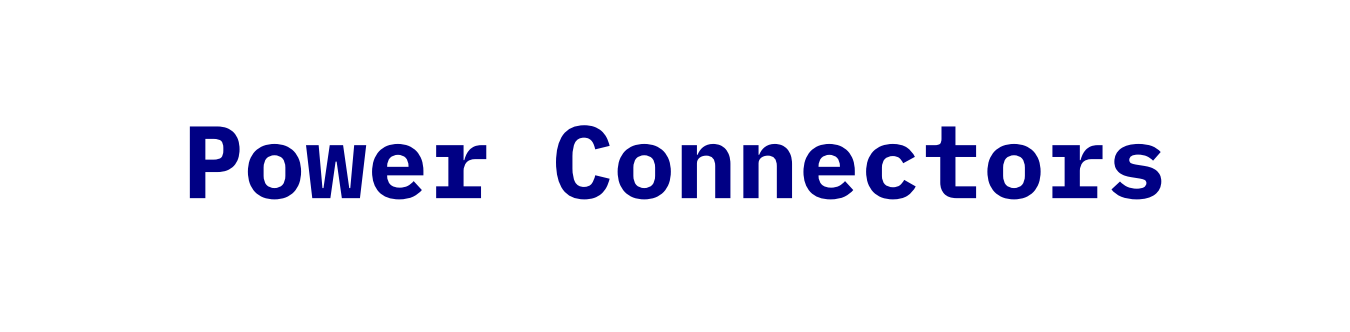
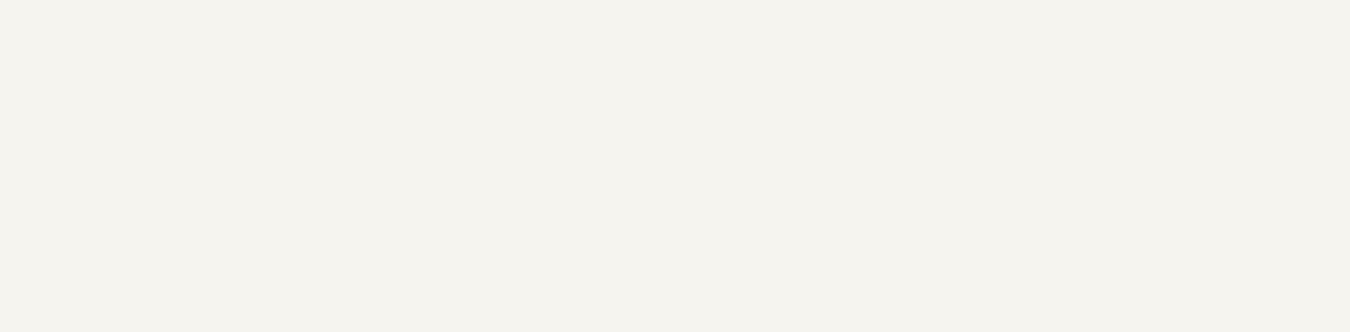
text: Power Connectors (675, 162) -> none

